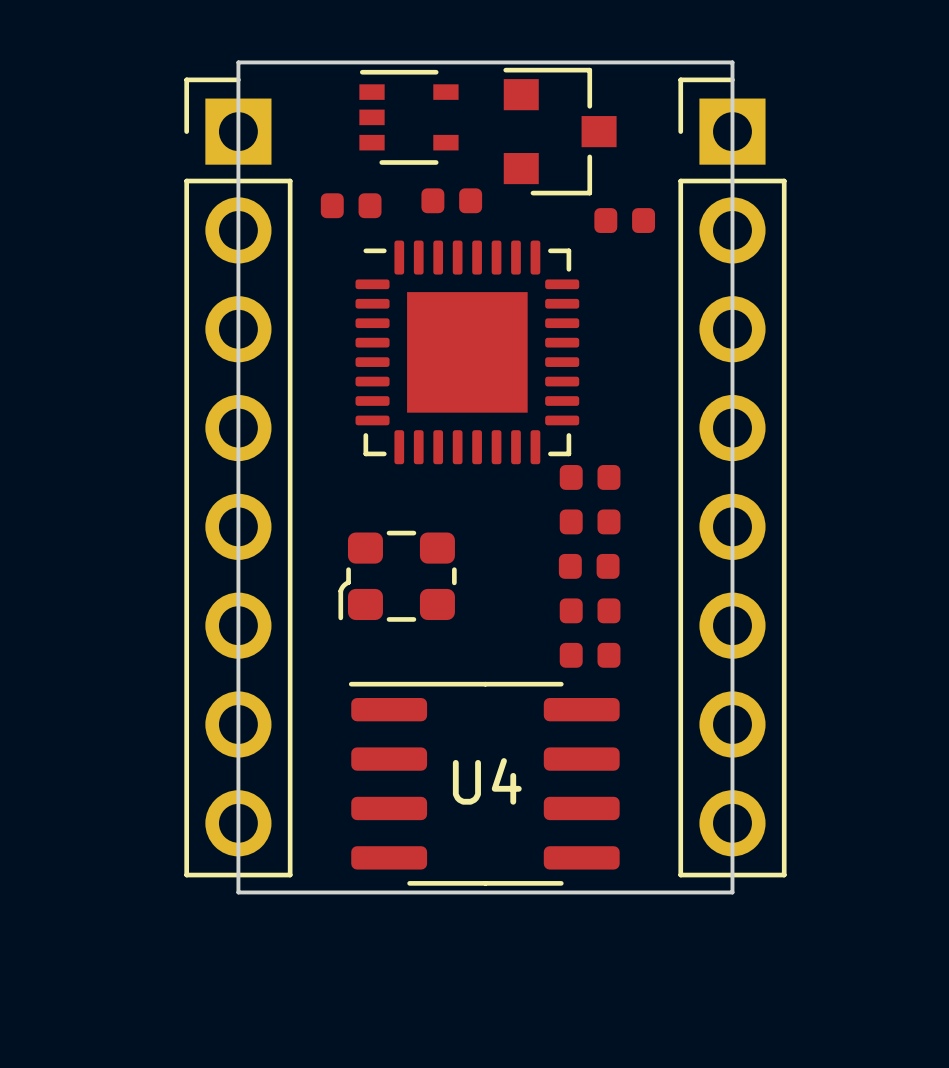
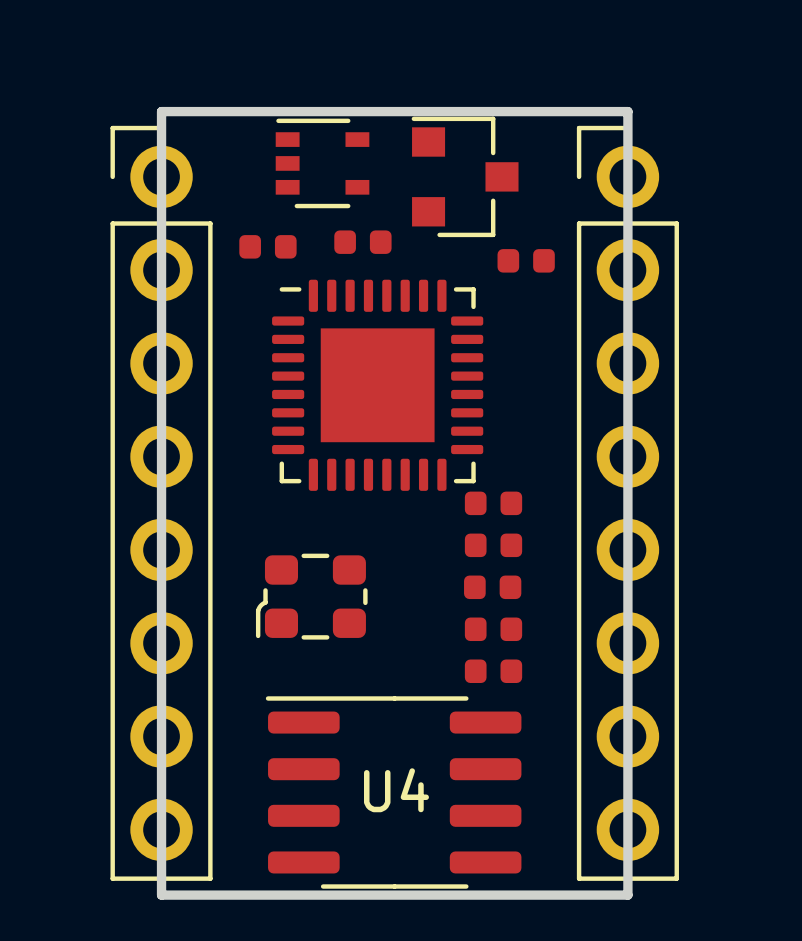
board edge width: thin (238, 62) (732, 62) (732, 892) (238, 892) (238, 62) -> thick (161, 111) (627, 111) (627, 895) (161, 895) (161, 111)
part footprint: [184, 77, 293, 878] -> [110, 125, 213, 881]
part footprint: [678, 77, 787, 878] -> [576, 125, 679, 881]

